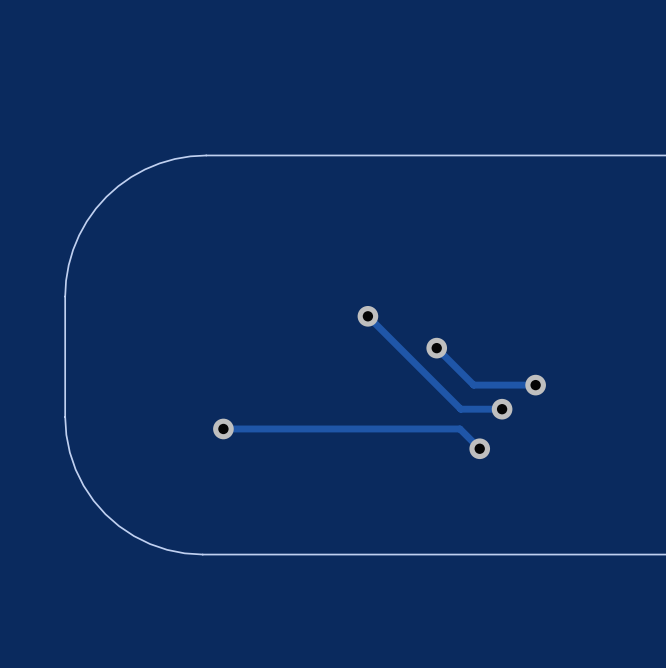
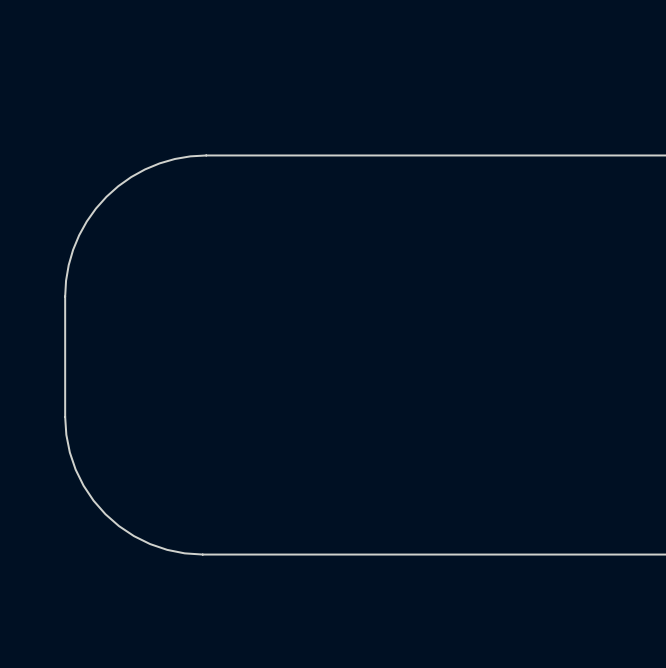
track: (367, 316) (460, 409) (502, 409) -> none
via: (367, 316) -> none
track: (436, 348) (473, 385) (535, 385) -> none
via: (436, 348) -> none
via: (535, 385) -> none
via: (502, 409) -> none
track: (223, 428) (459, 428) (479, 448) -> none
via: (223, 428) -> none
via: (479, 448) -> none

